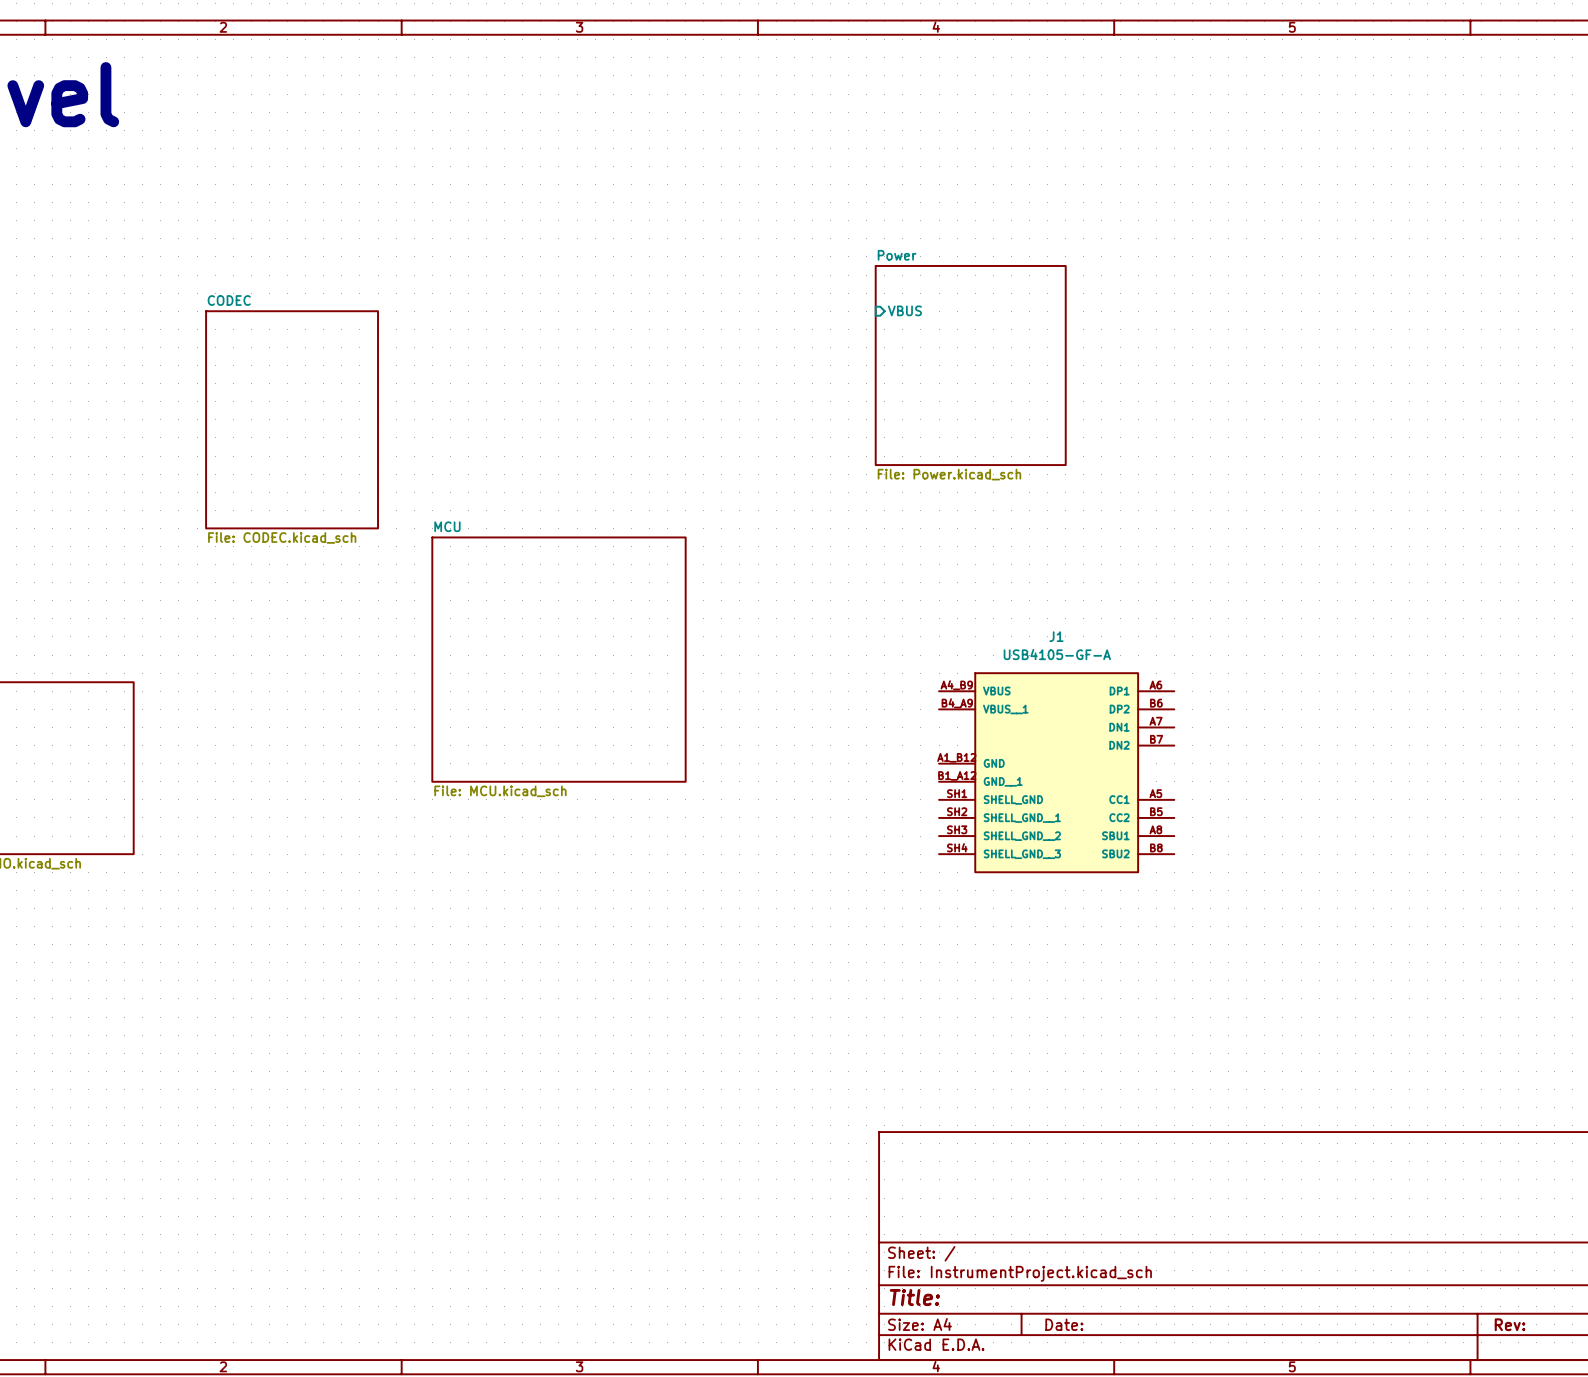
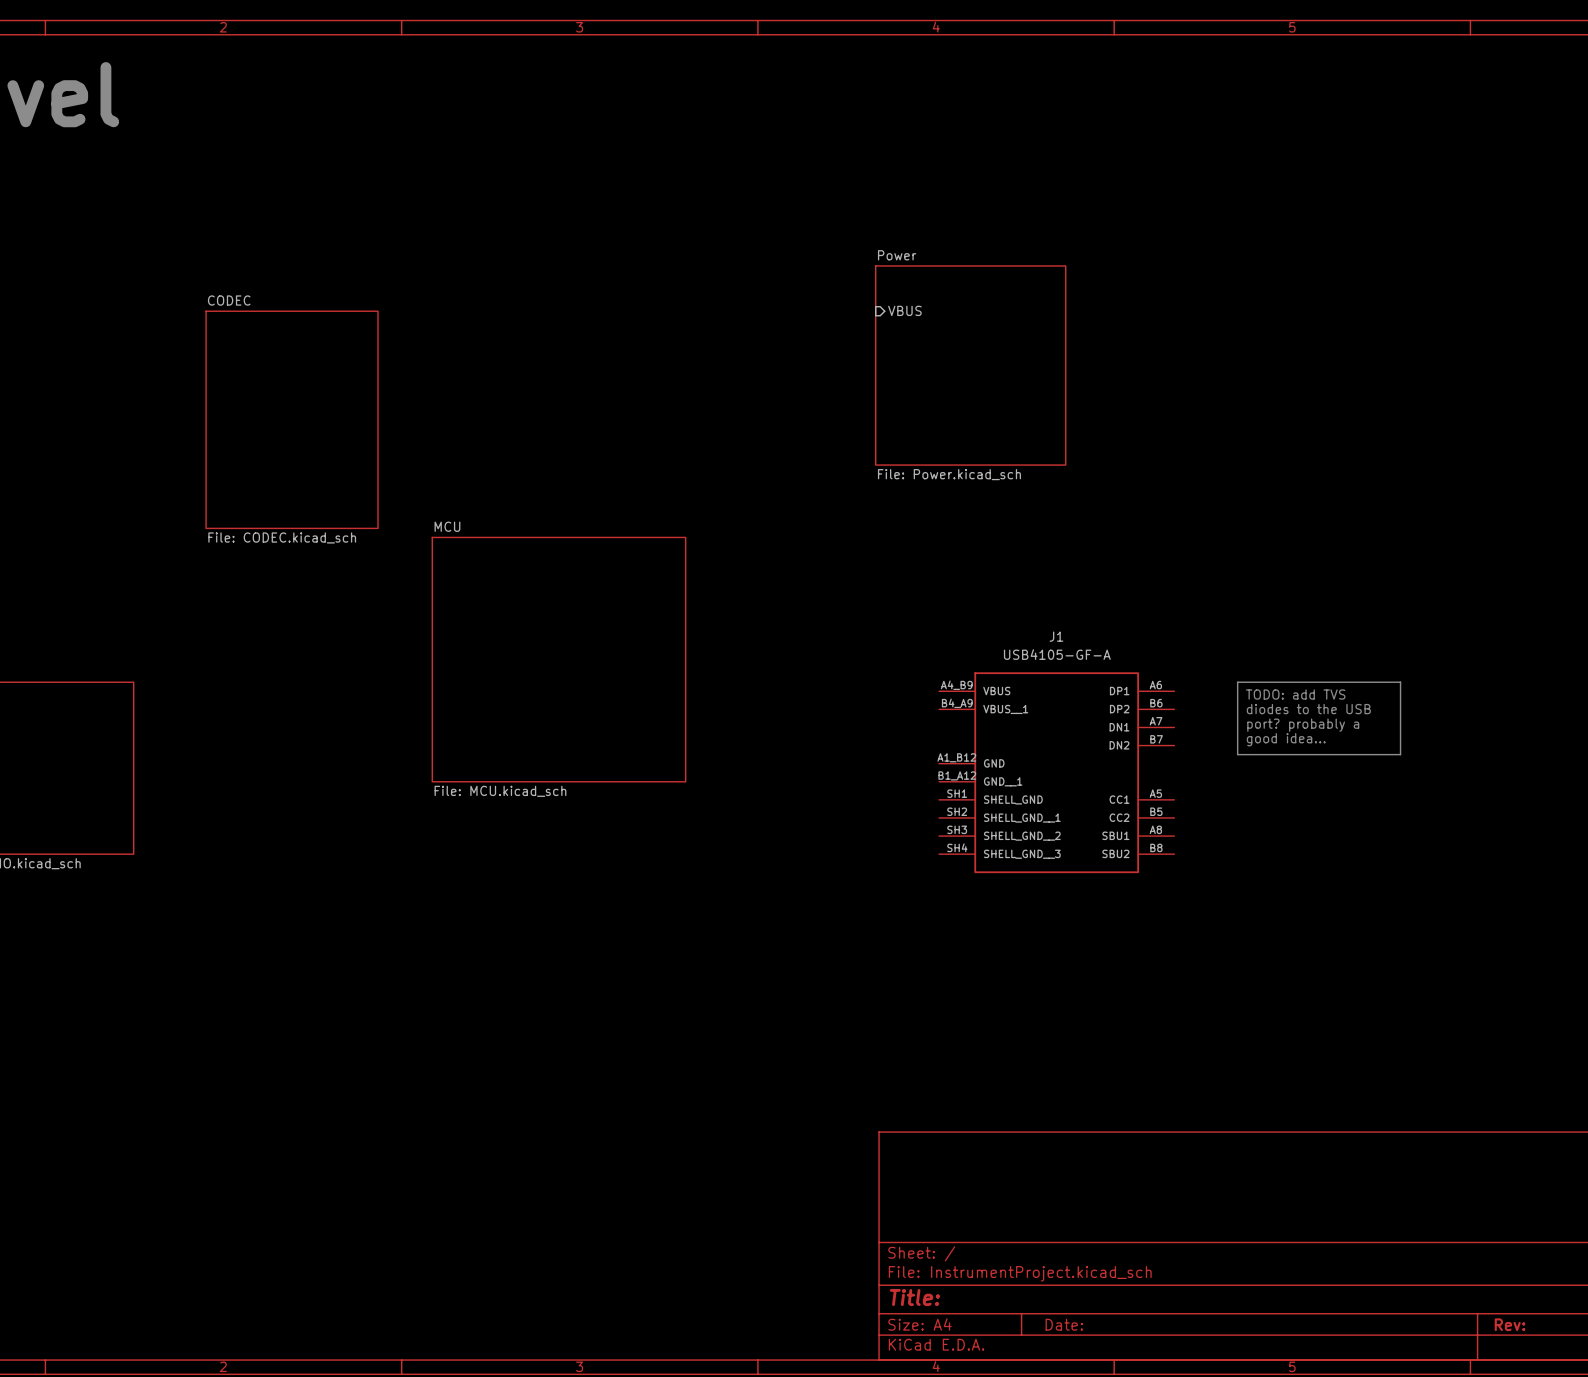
line: none -> (1237, 682) (1400, 682) (1400, 754) (1237, 754) (1237, 682)
text: none -> TODO: add TVS (1295, 694)
text: none -> diodes to the USB (1308, 709)
text: none -> port? probably a (1303, 725)
text: none -> good idea... (1286, 739)

